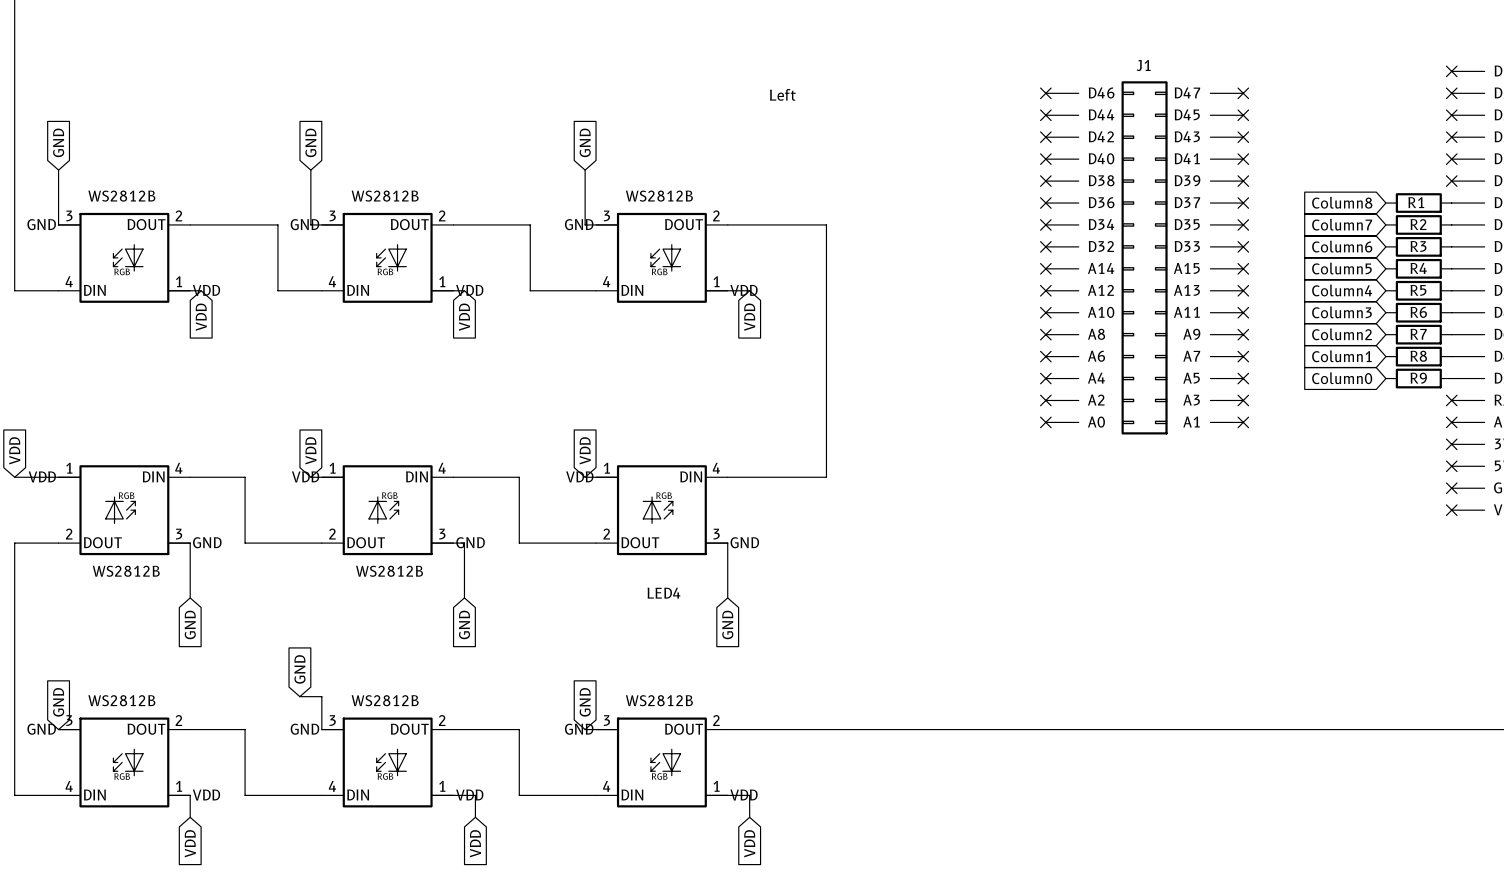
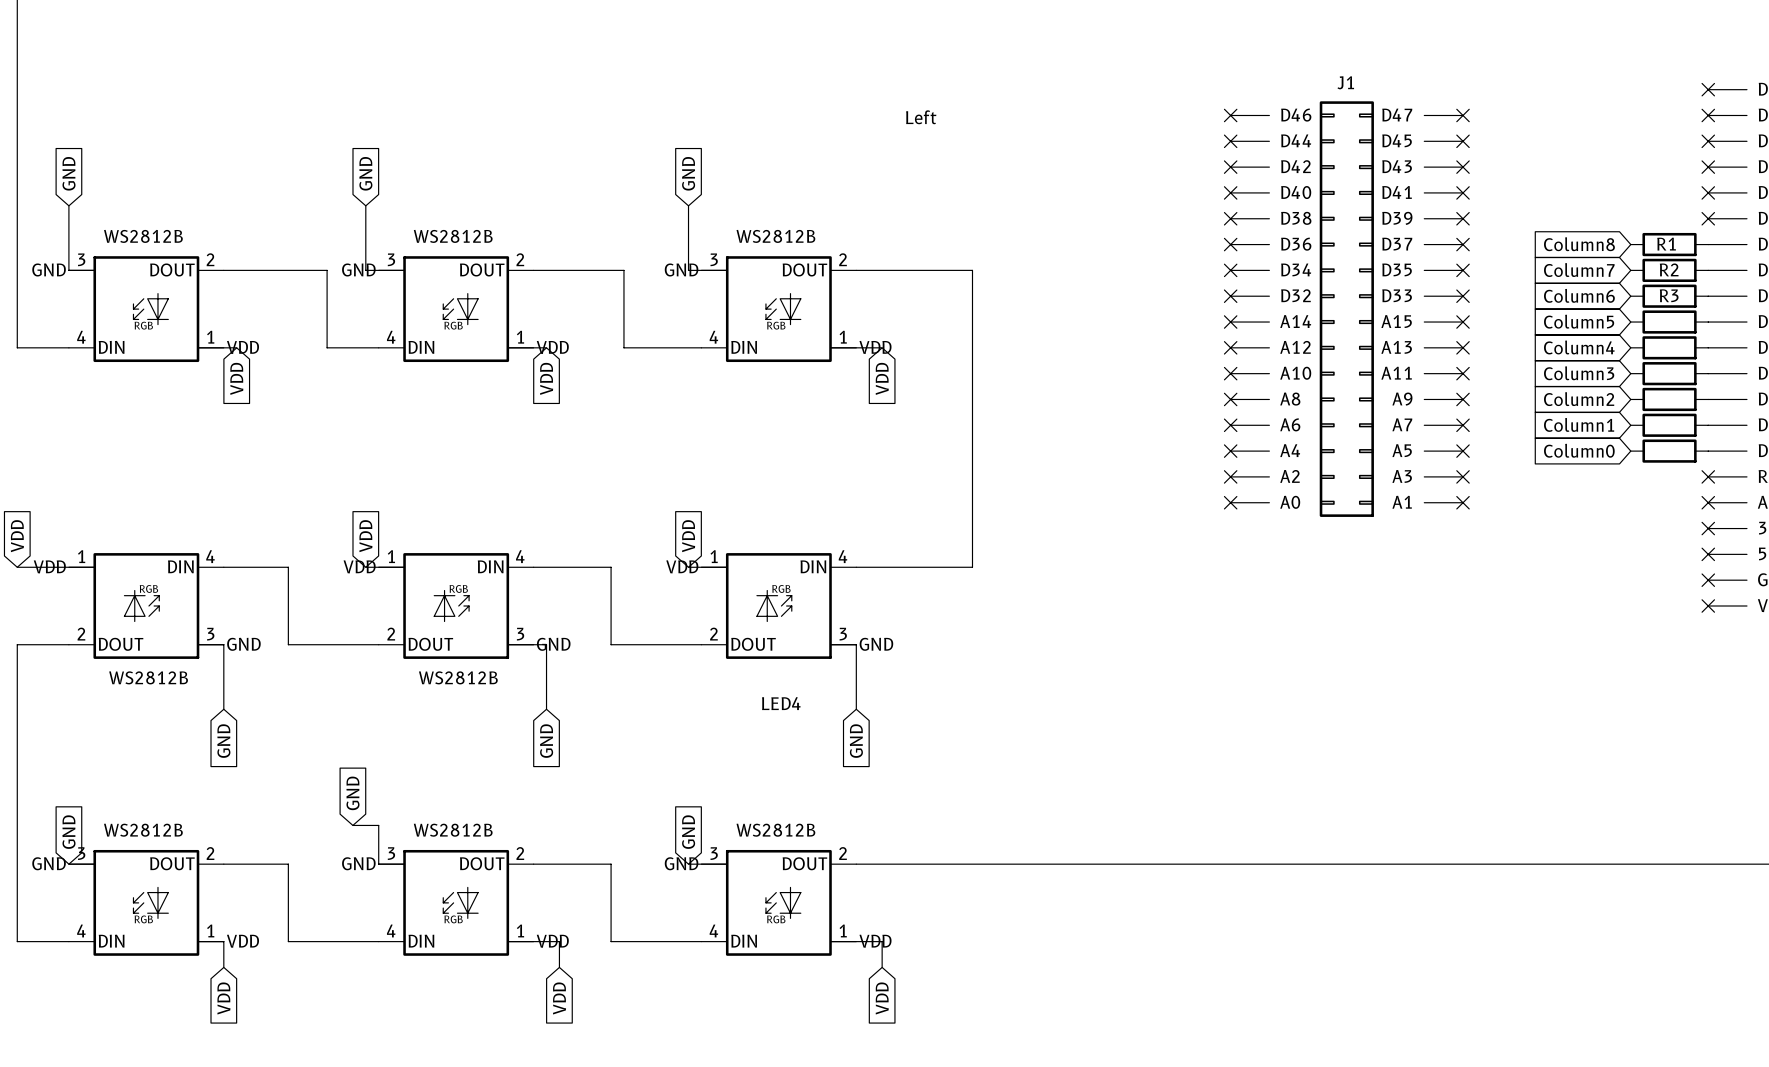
R4 name: R4 (1418, 268) -> none
R5 name: R5 (1418, 290) -> none
R6 name: R6 (1418, 312) -> none
R7 name: R7 (1418, 334) -> none
R8 name: R8 (1418, 356) -> none
R9 name: R9 (1418, 378) -> none

